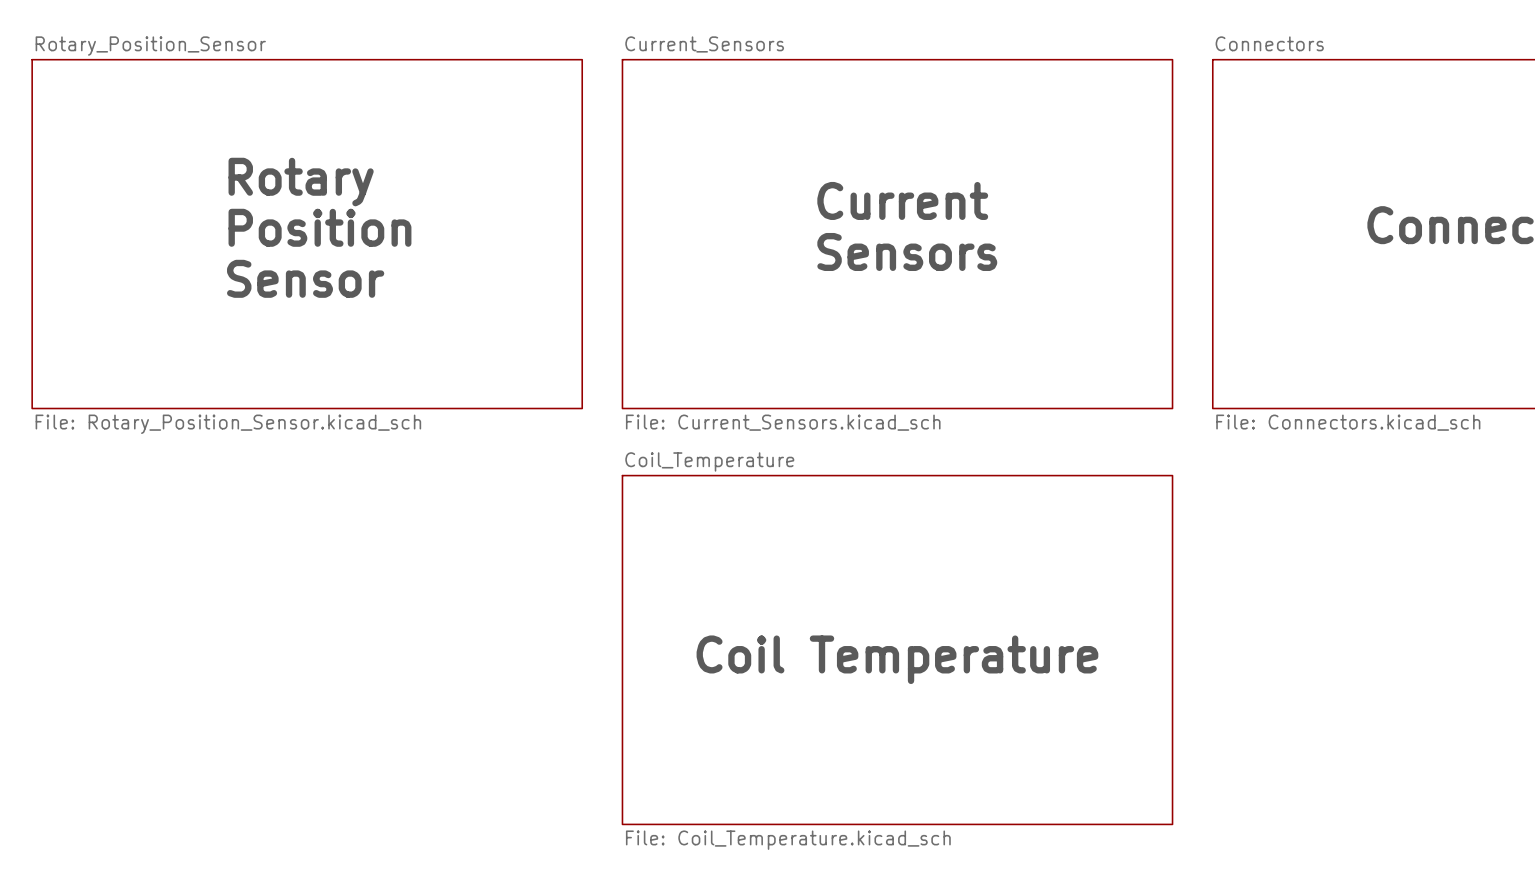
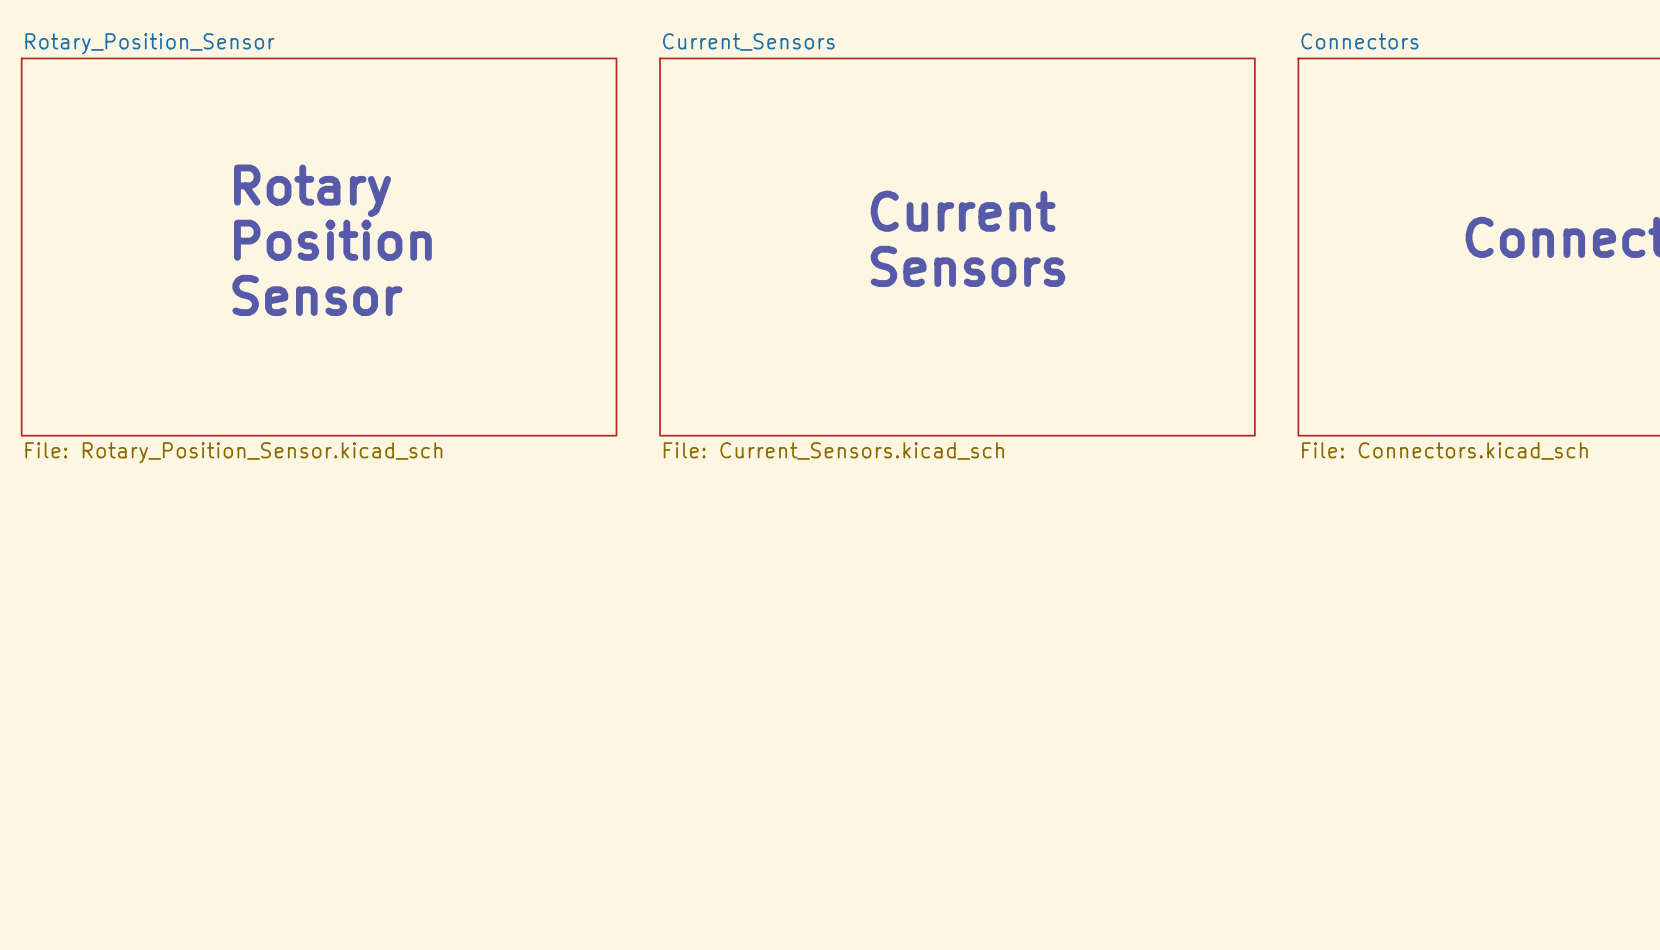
sheet Coil_Temperature: File: Coil_Temperature.kicad_sch (897, 650) -> none
text: Coil Temperature (897, 659) -> none

